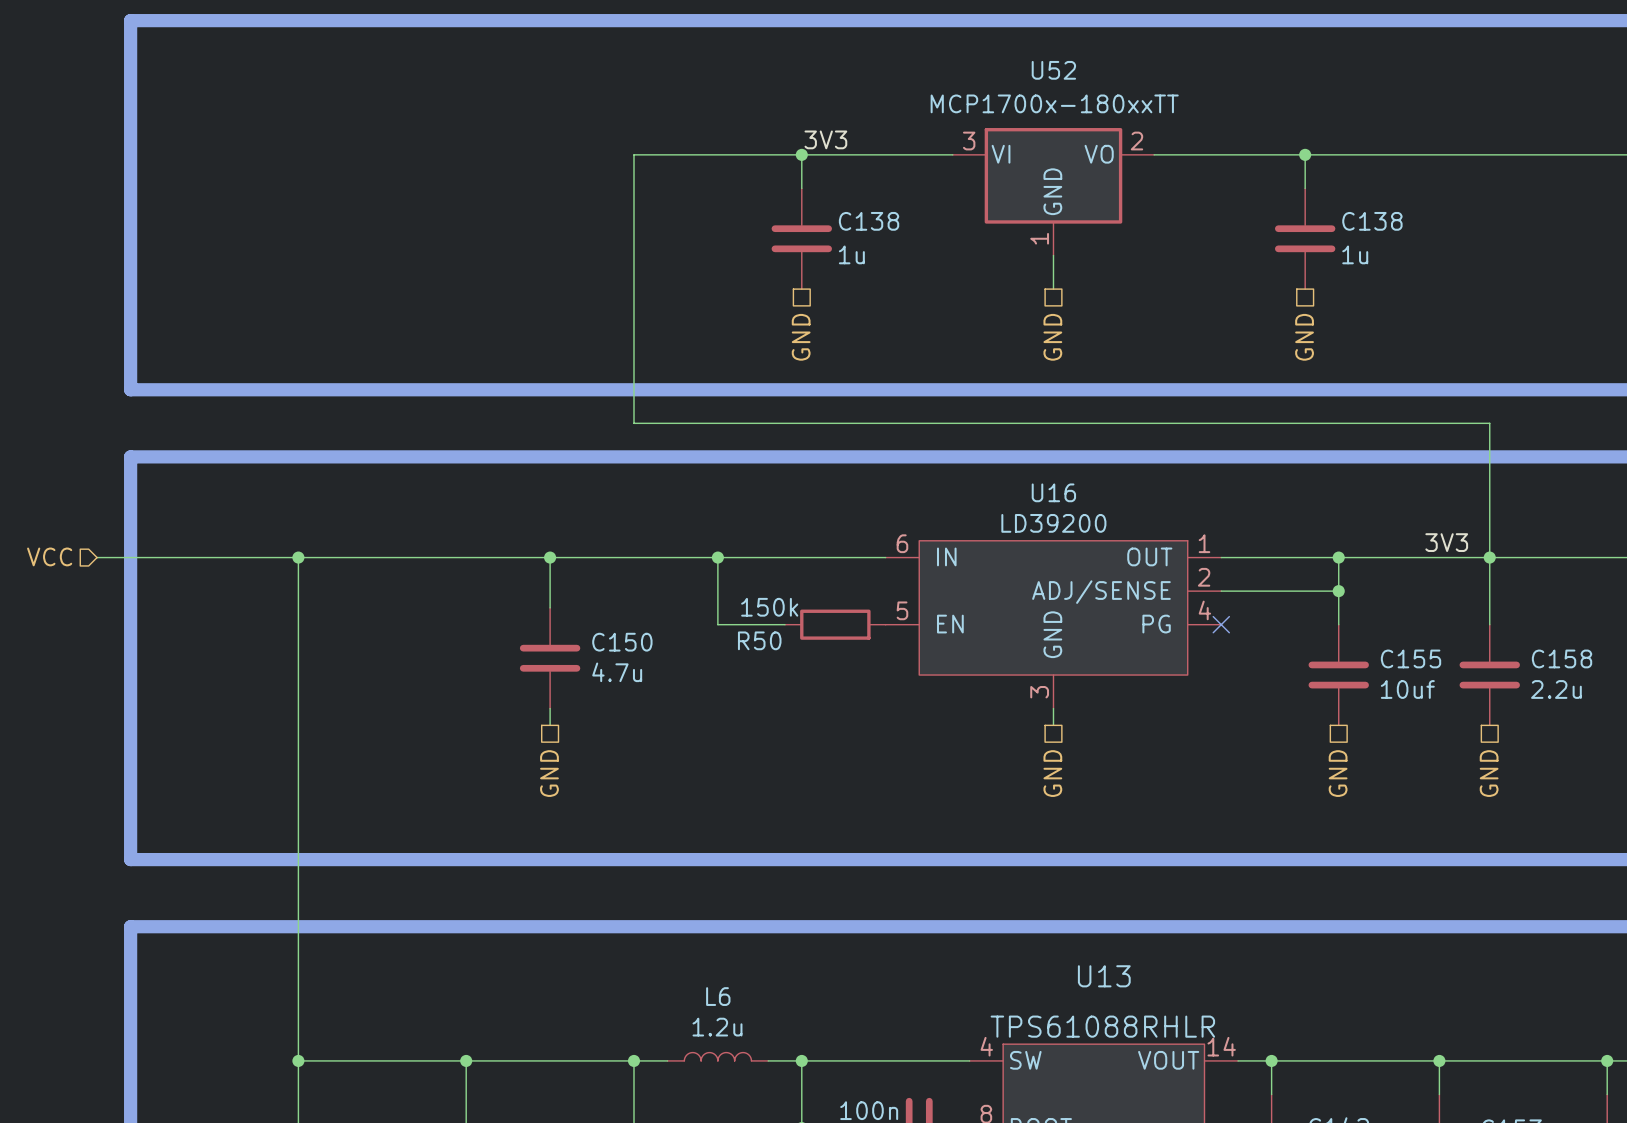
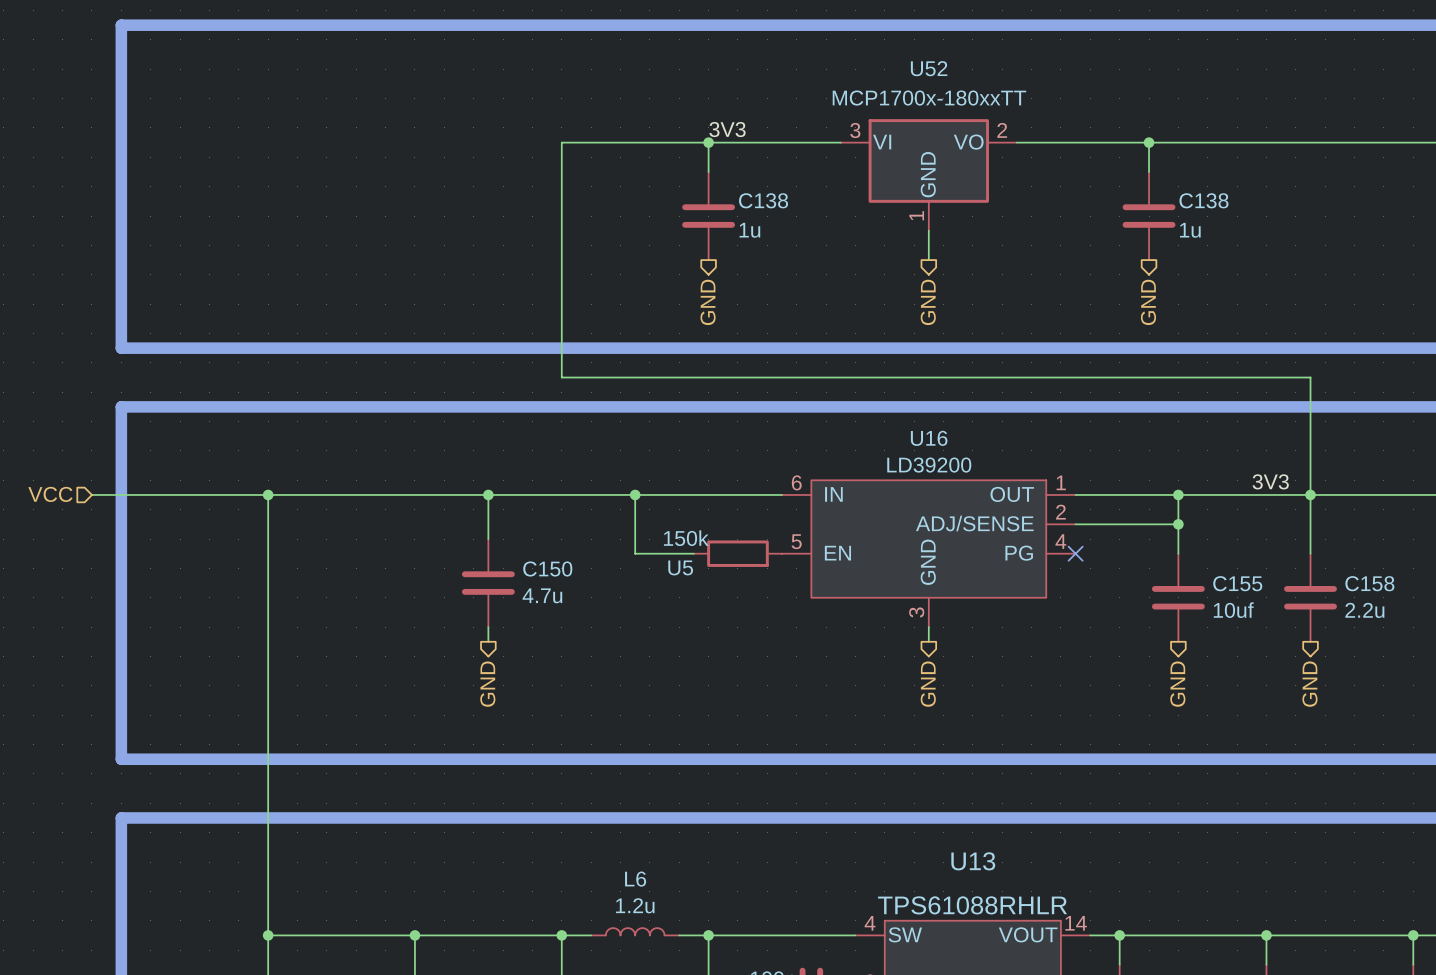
hierarchical label shape: passive (801, 337) -> output (708, 302)
hierarchical label shape: passive (1052, 337) -> output (928, 302)
hierarchical label shape: passive (1304, 337) -> output (1148, 302)
R50 name: R50 (759, 640) -> U5 (680, 567)
hierarchical label shape: passive (549, 773) -> output (487, 684)
hierarchical label shape: passive (1052, 773) -> output (928, 684)
hierarchical label shape: passive (1338, 773) -> output (1177, 684)
hierarchical label shape: passive (1489, 773) -> output (1309, 684)

